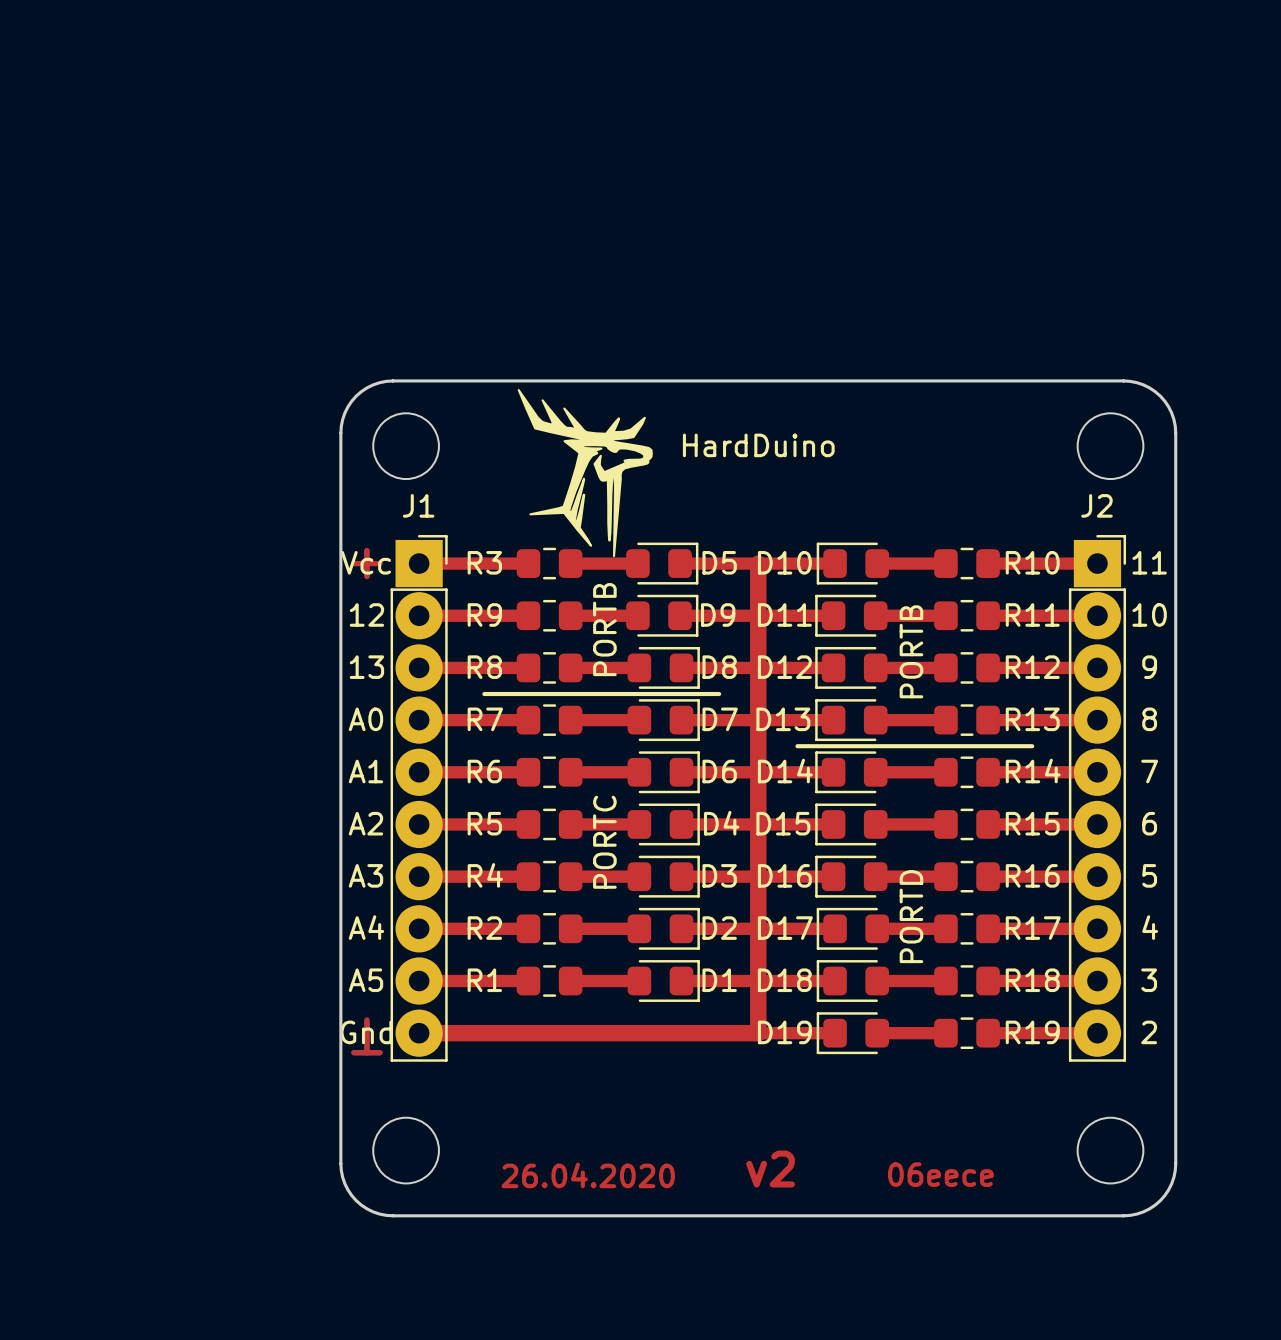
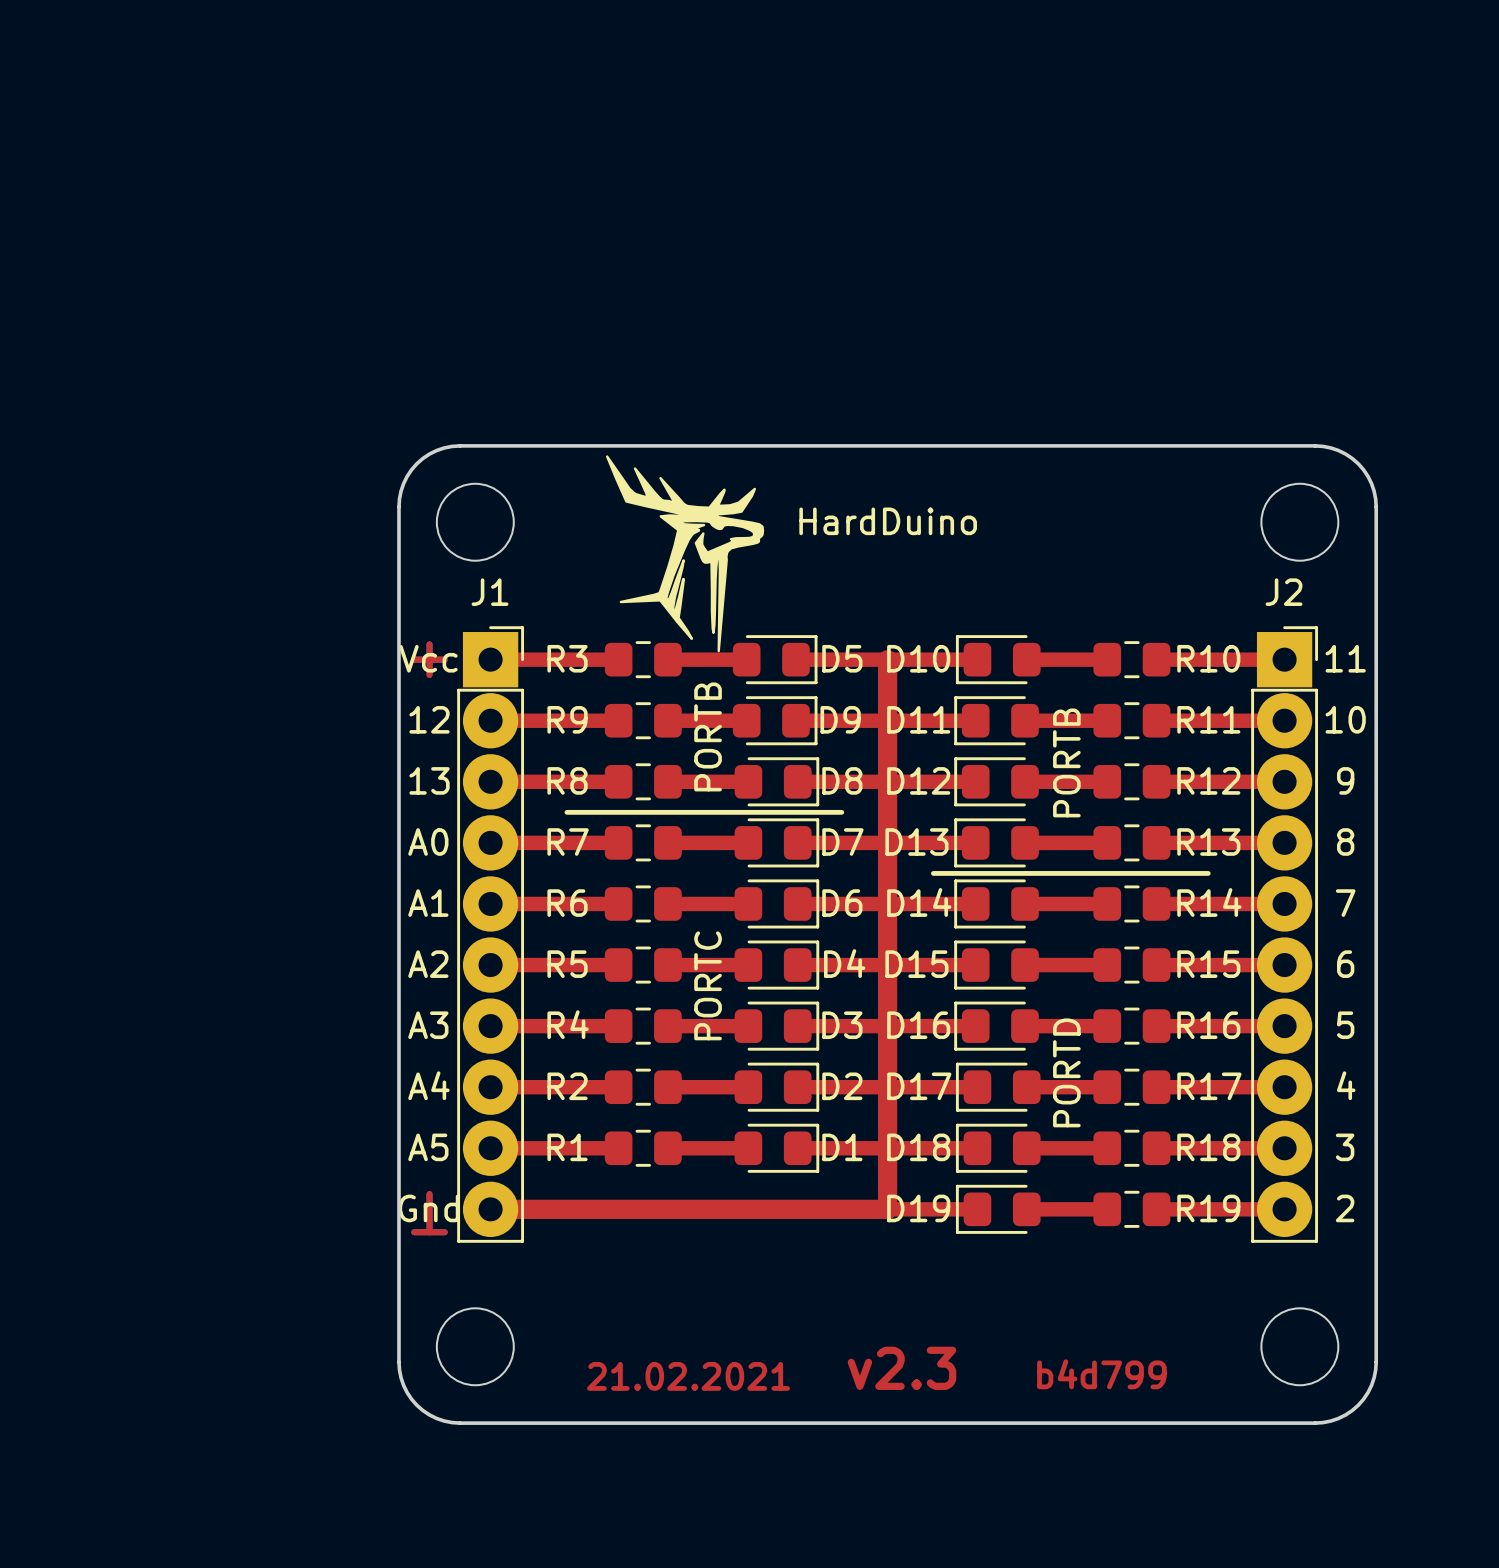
text: v2 (770, 1169) -> v2.3 (902, 1368)
text: 06eece (940, 1174) -> b4d799 (1101, 1374)
text: 26.04.2020 (588, 1175) -> 21.02.2021 (688, 1376)

